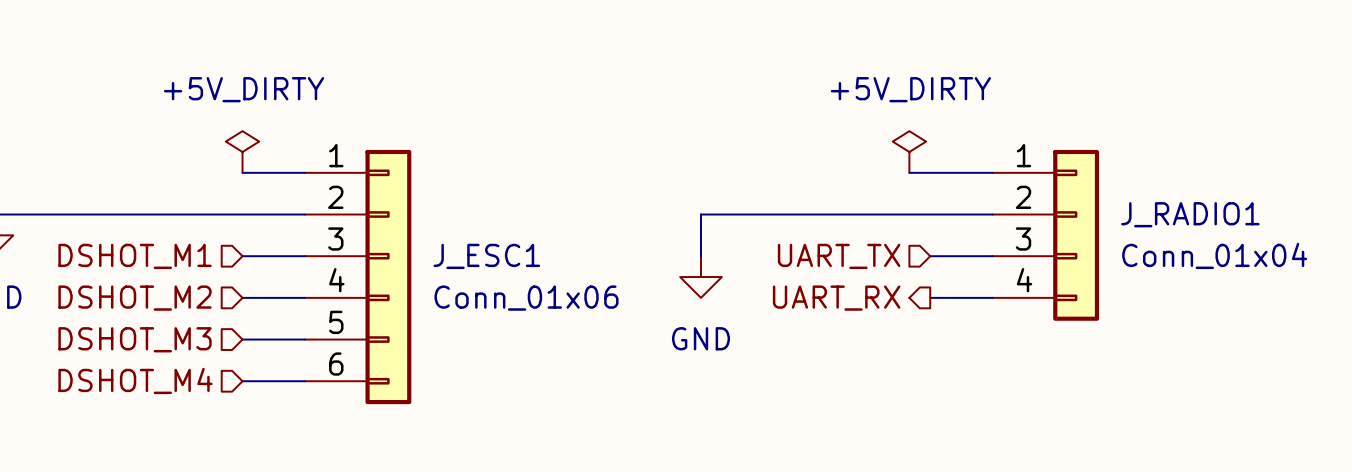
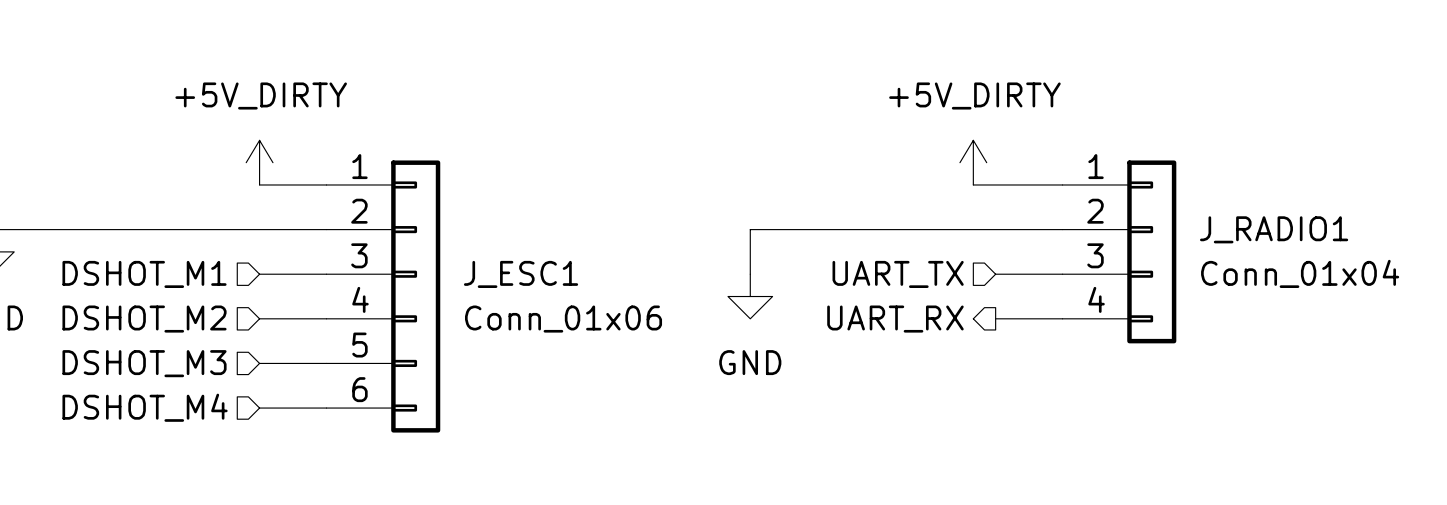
power symbol shape: [225, 131, 260, 173] -> [246, 140, 273, 185]
power symbol shape: [892, 131, 927, 173] -> [959, 140, 987, 185]

